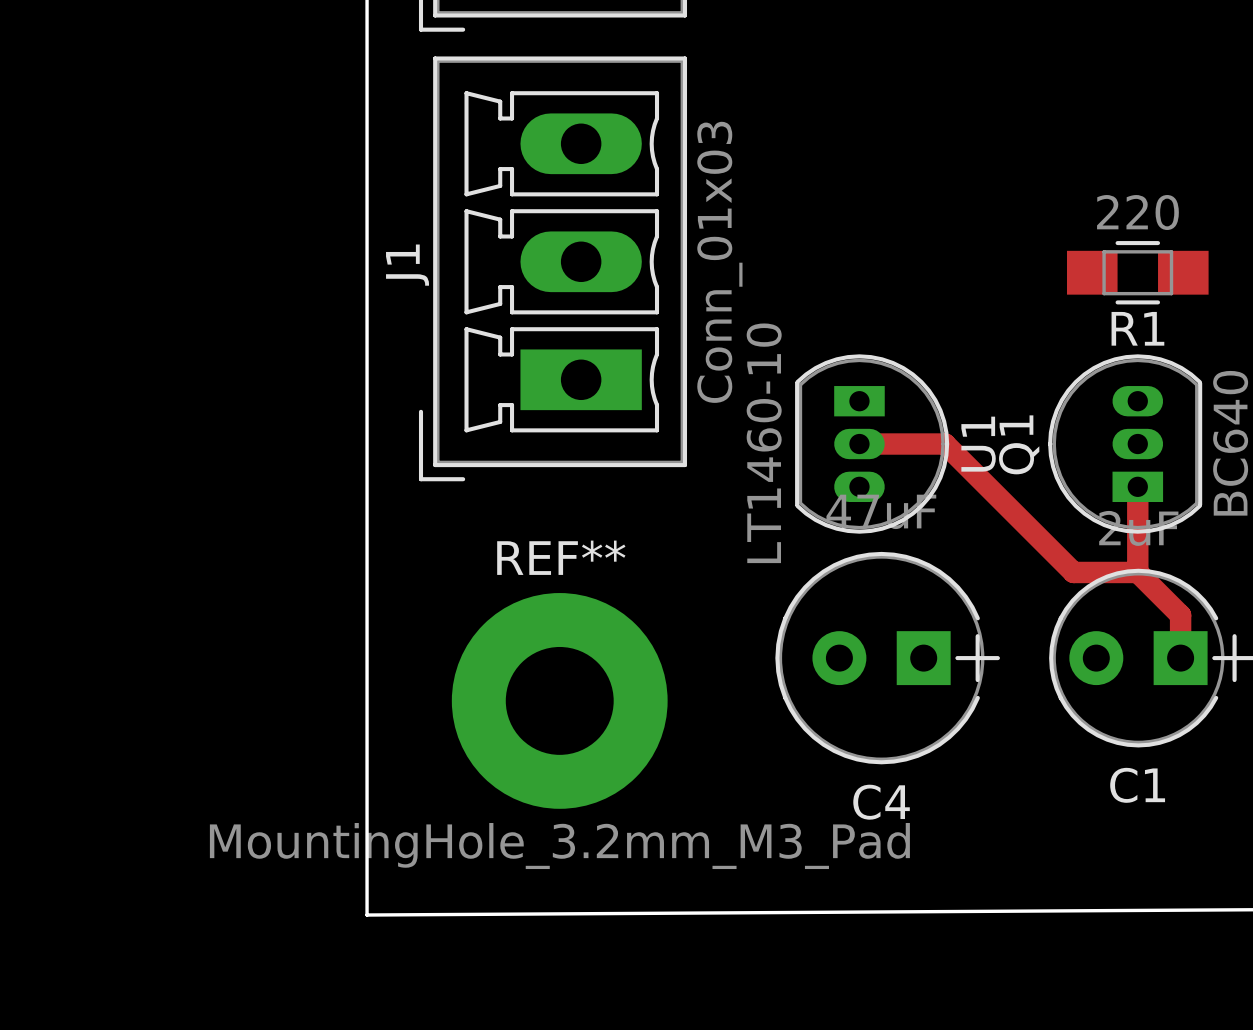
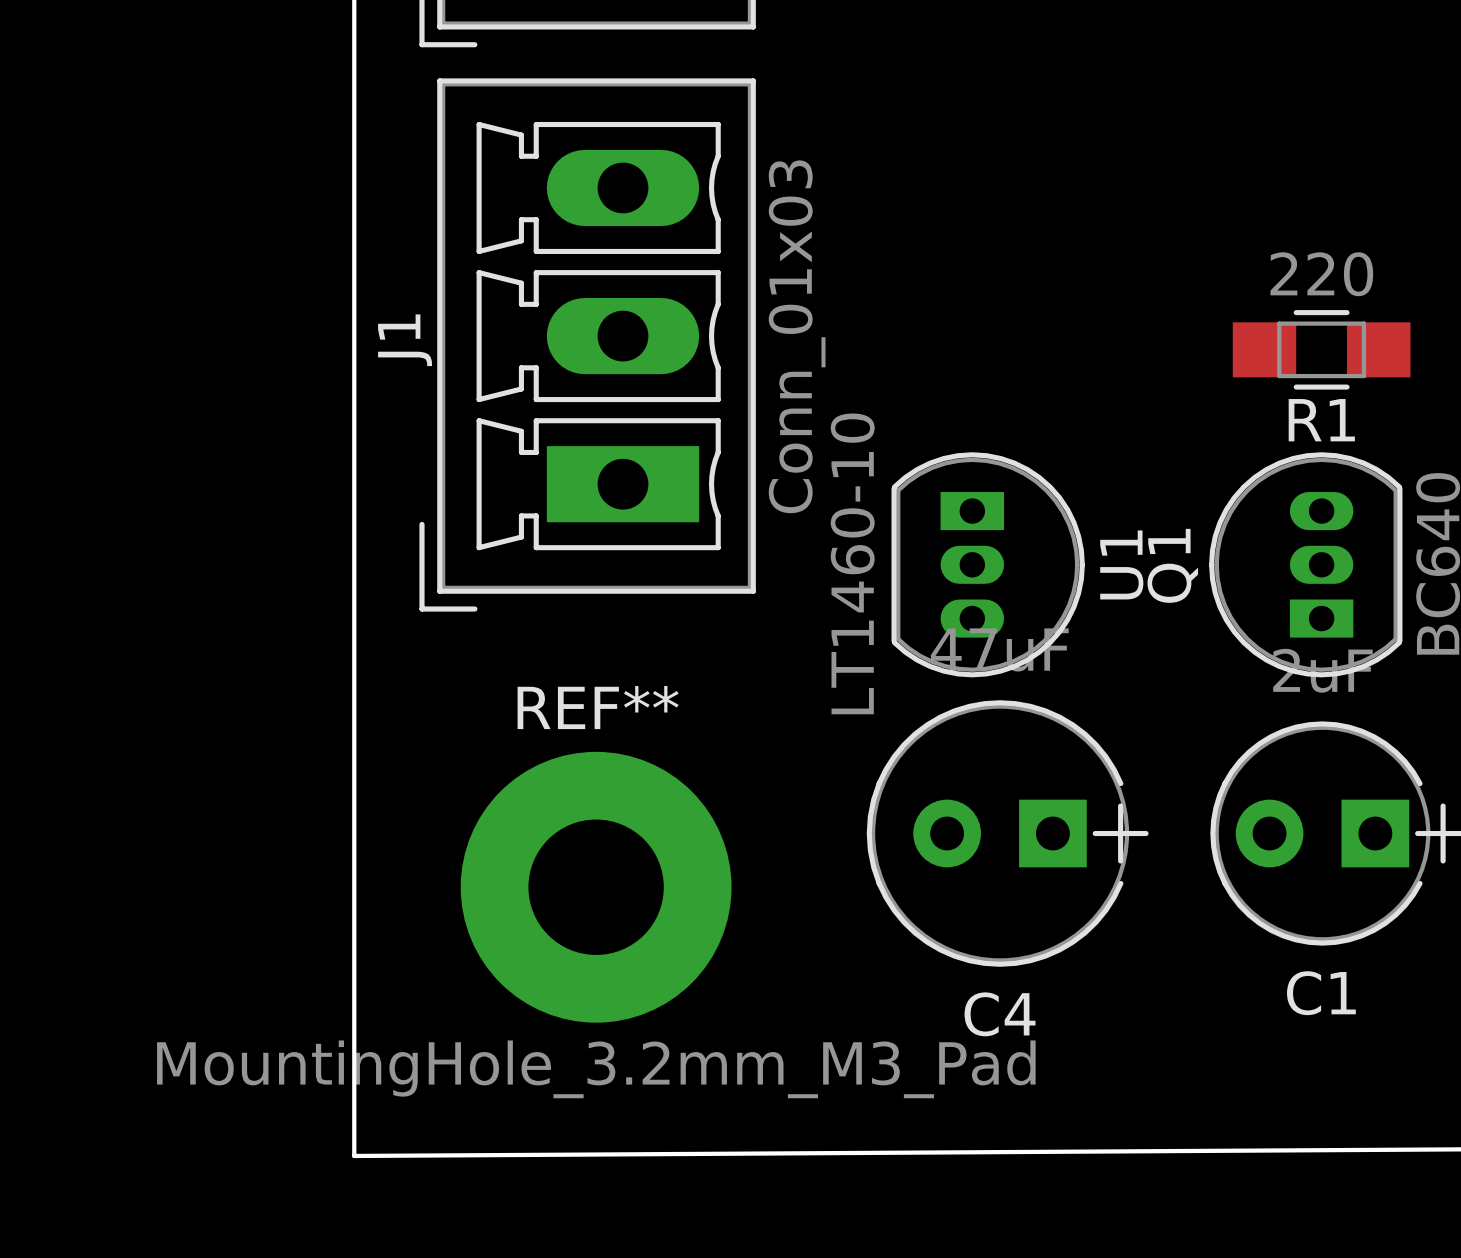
track: (859, 444) (945, 444) (1073, 572) (1137, 572) -> none
track: (1137, 486) (1137, 572) -> none
track: (1137, 572) (1180, 615) (1180, 658) -> none

